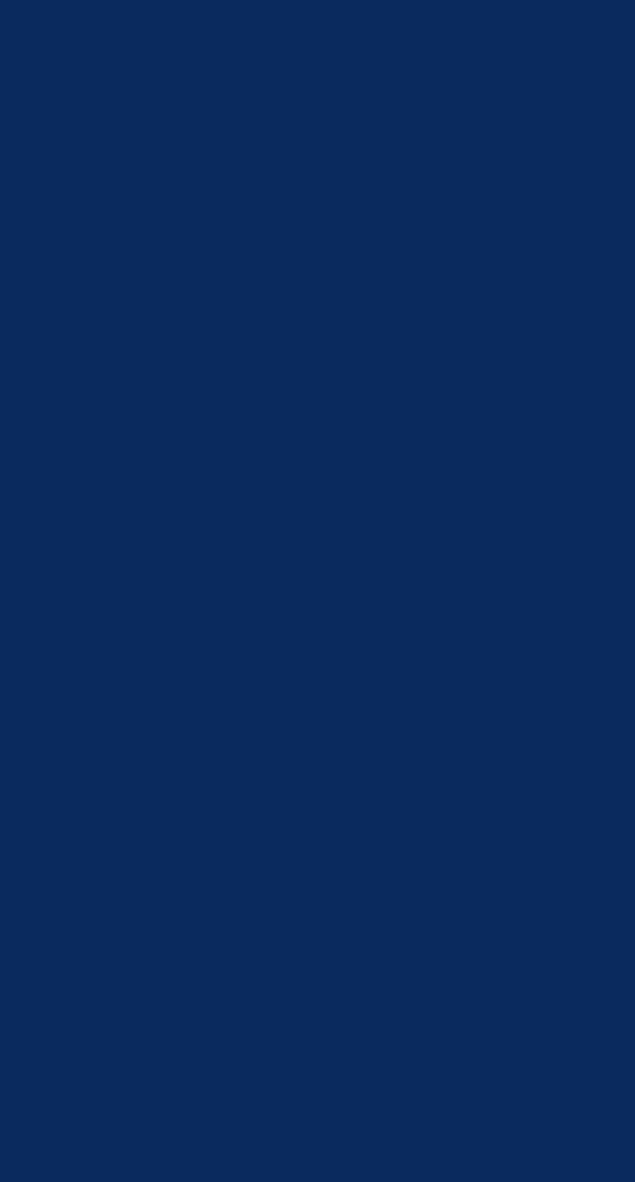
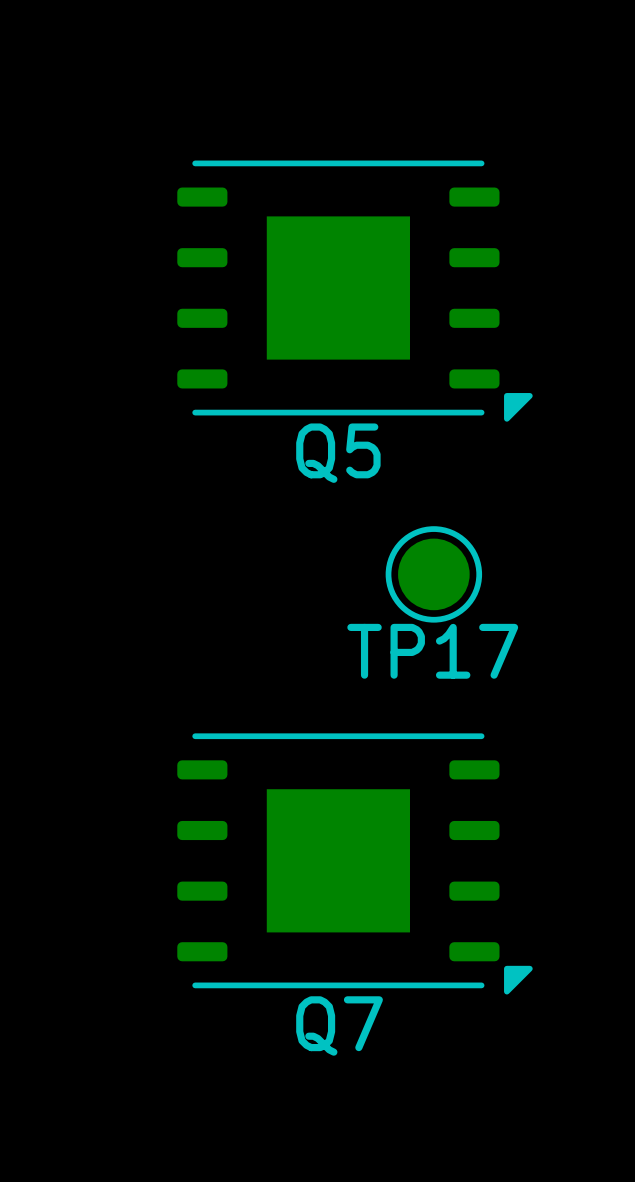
Q5: none -> (354, 291)
TP17: none -> (433, 574)
Q7: none -> (354, 863)

